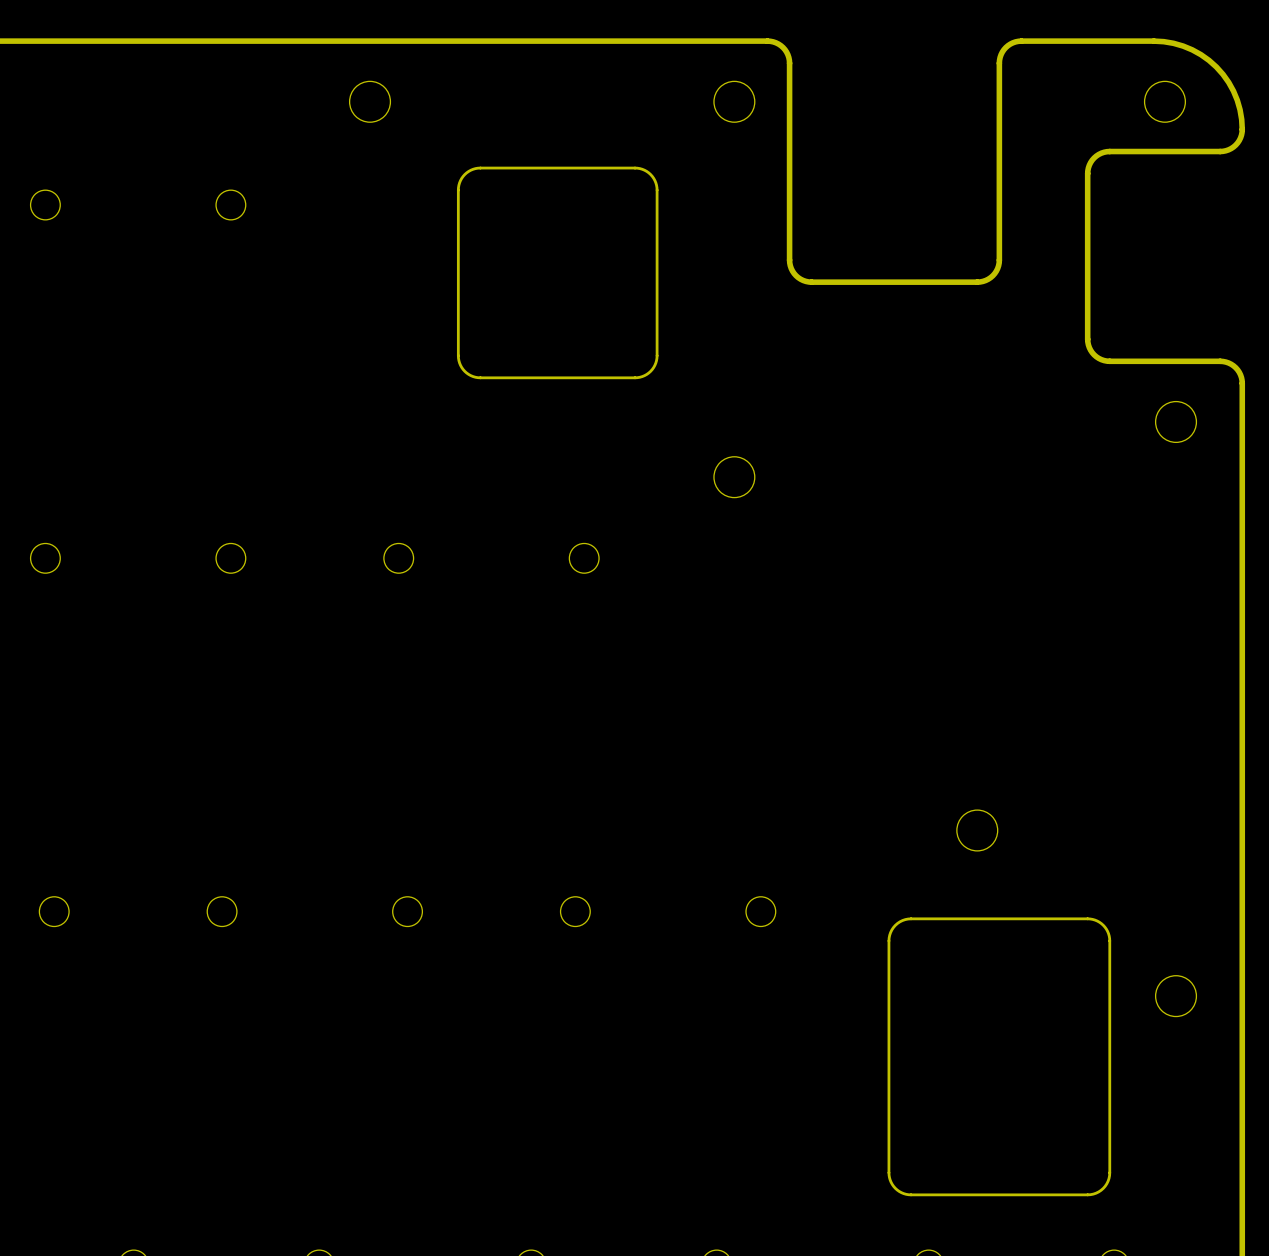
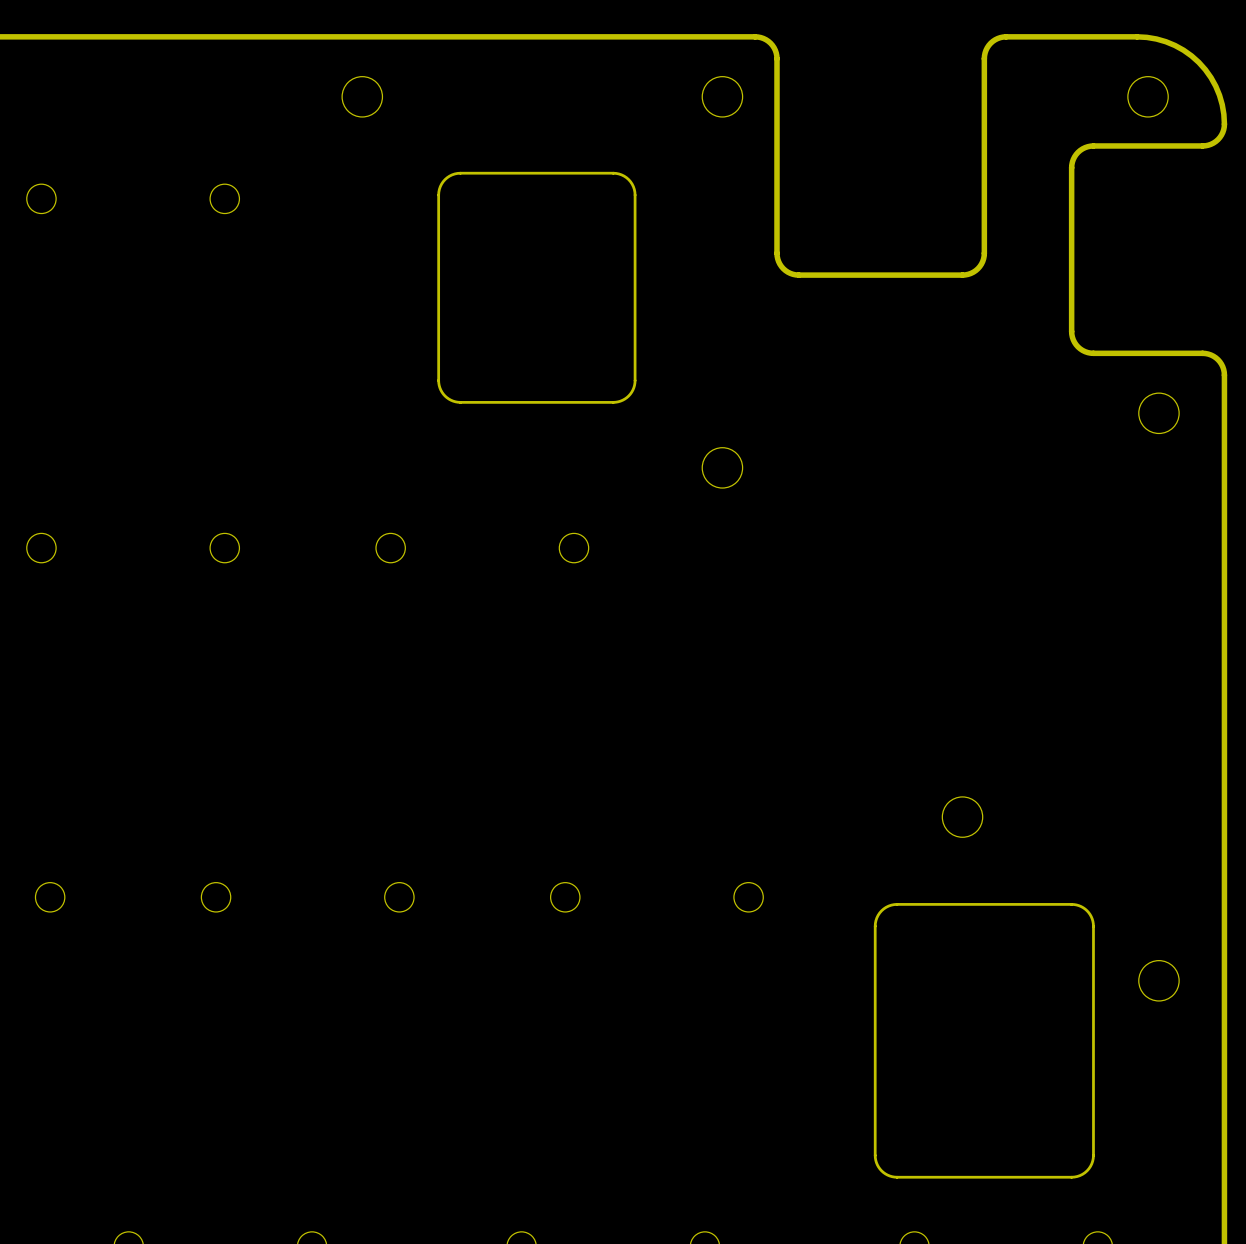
board edge: (480, 168) (635, 168) (644, 170) (652, 176) (657, 190) (657, 355) (654, 365) (648, 373) (635, 377) (480, 377) (470, 375) (463, 369) (458, 355) (458, 187) (460, 180) (466, 172) (480, 168) -> (460, 173) (447, 177) (441, 184) (438, 192) (438, 380) (443, 394) (450, 400) (460, 402) (613, 402) (626, 397) (632, 390) (635, 380) (635, 195) (630, 181) (621, 174) (613, 173) (460, 173)

